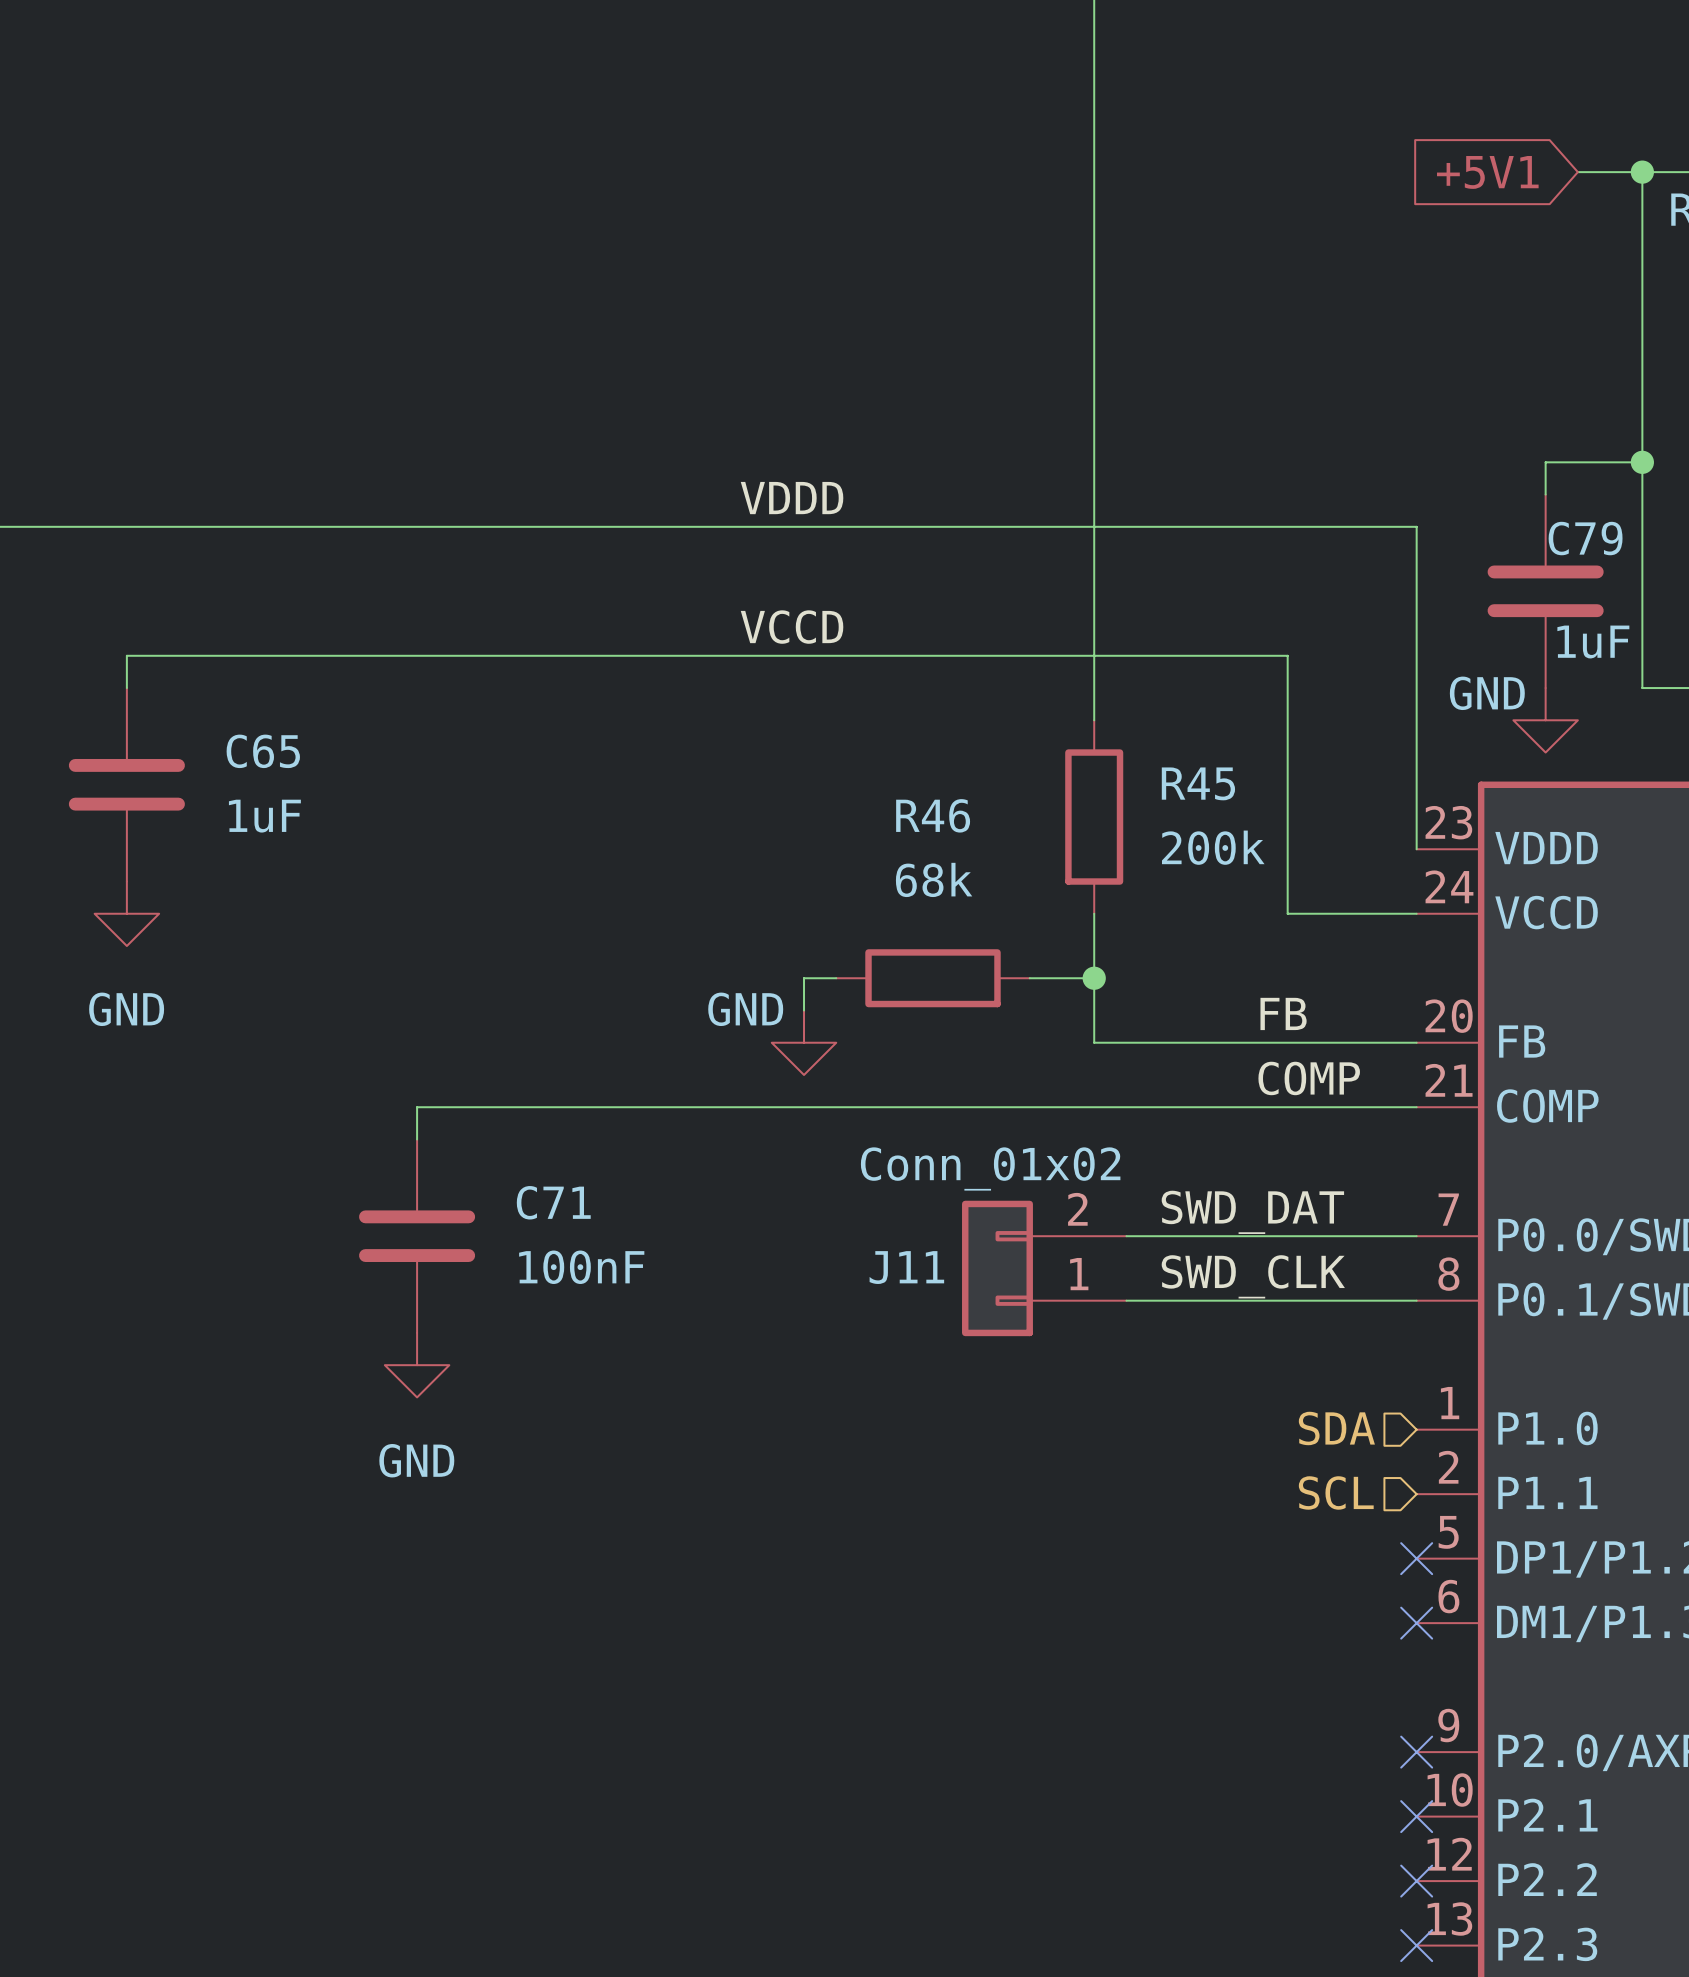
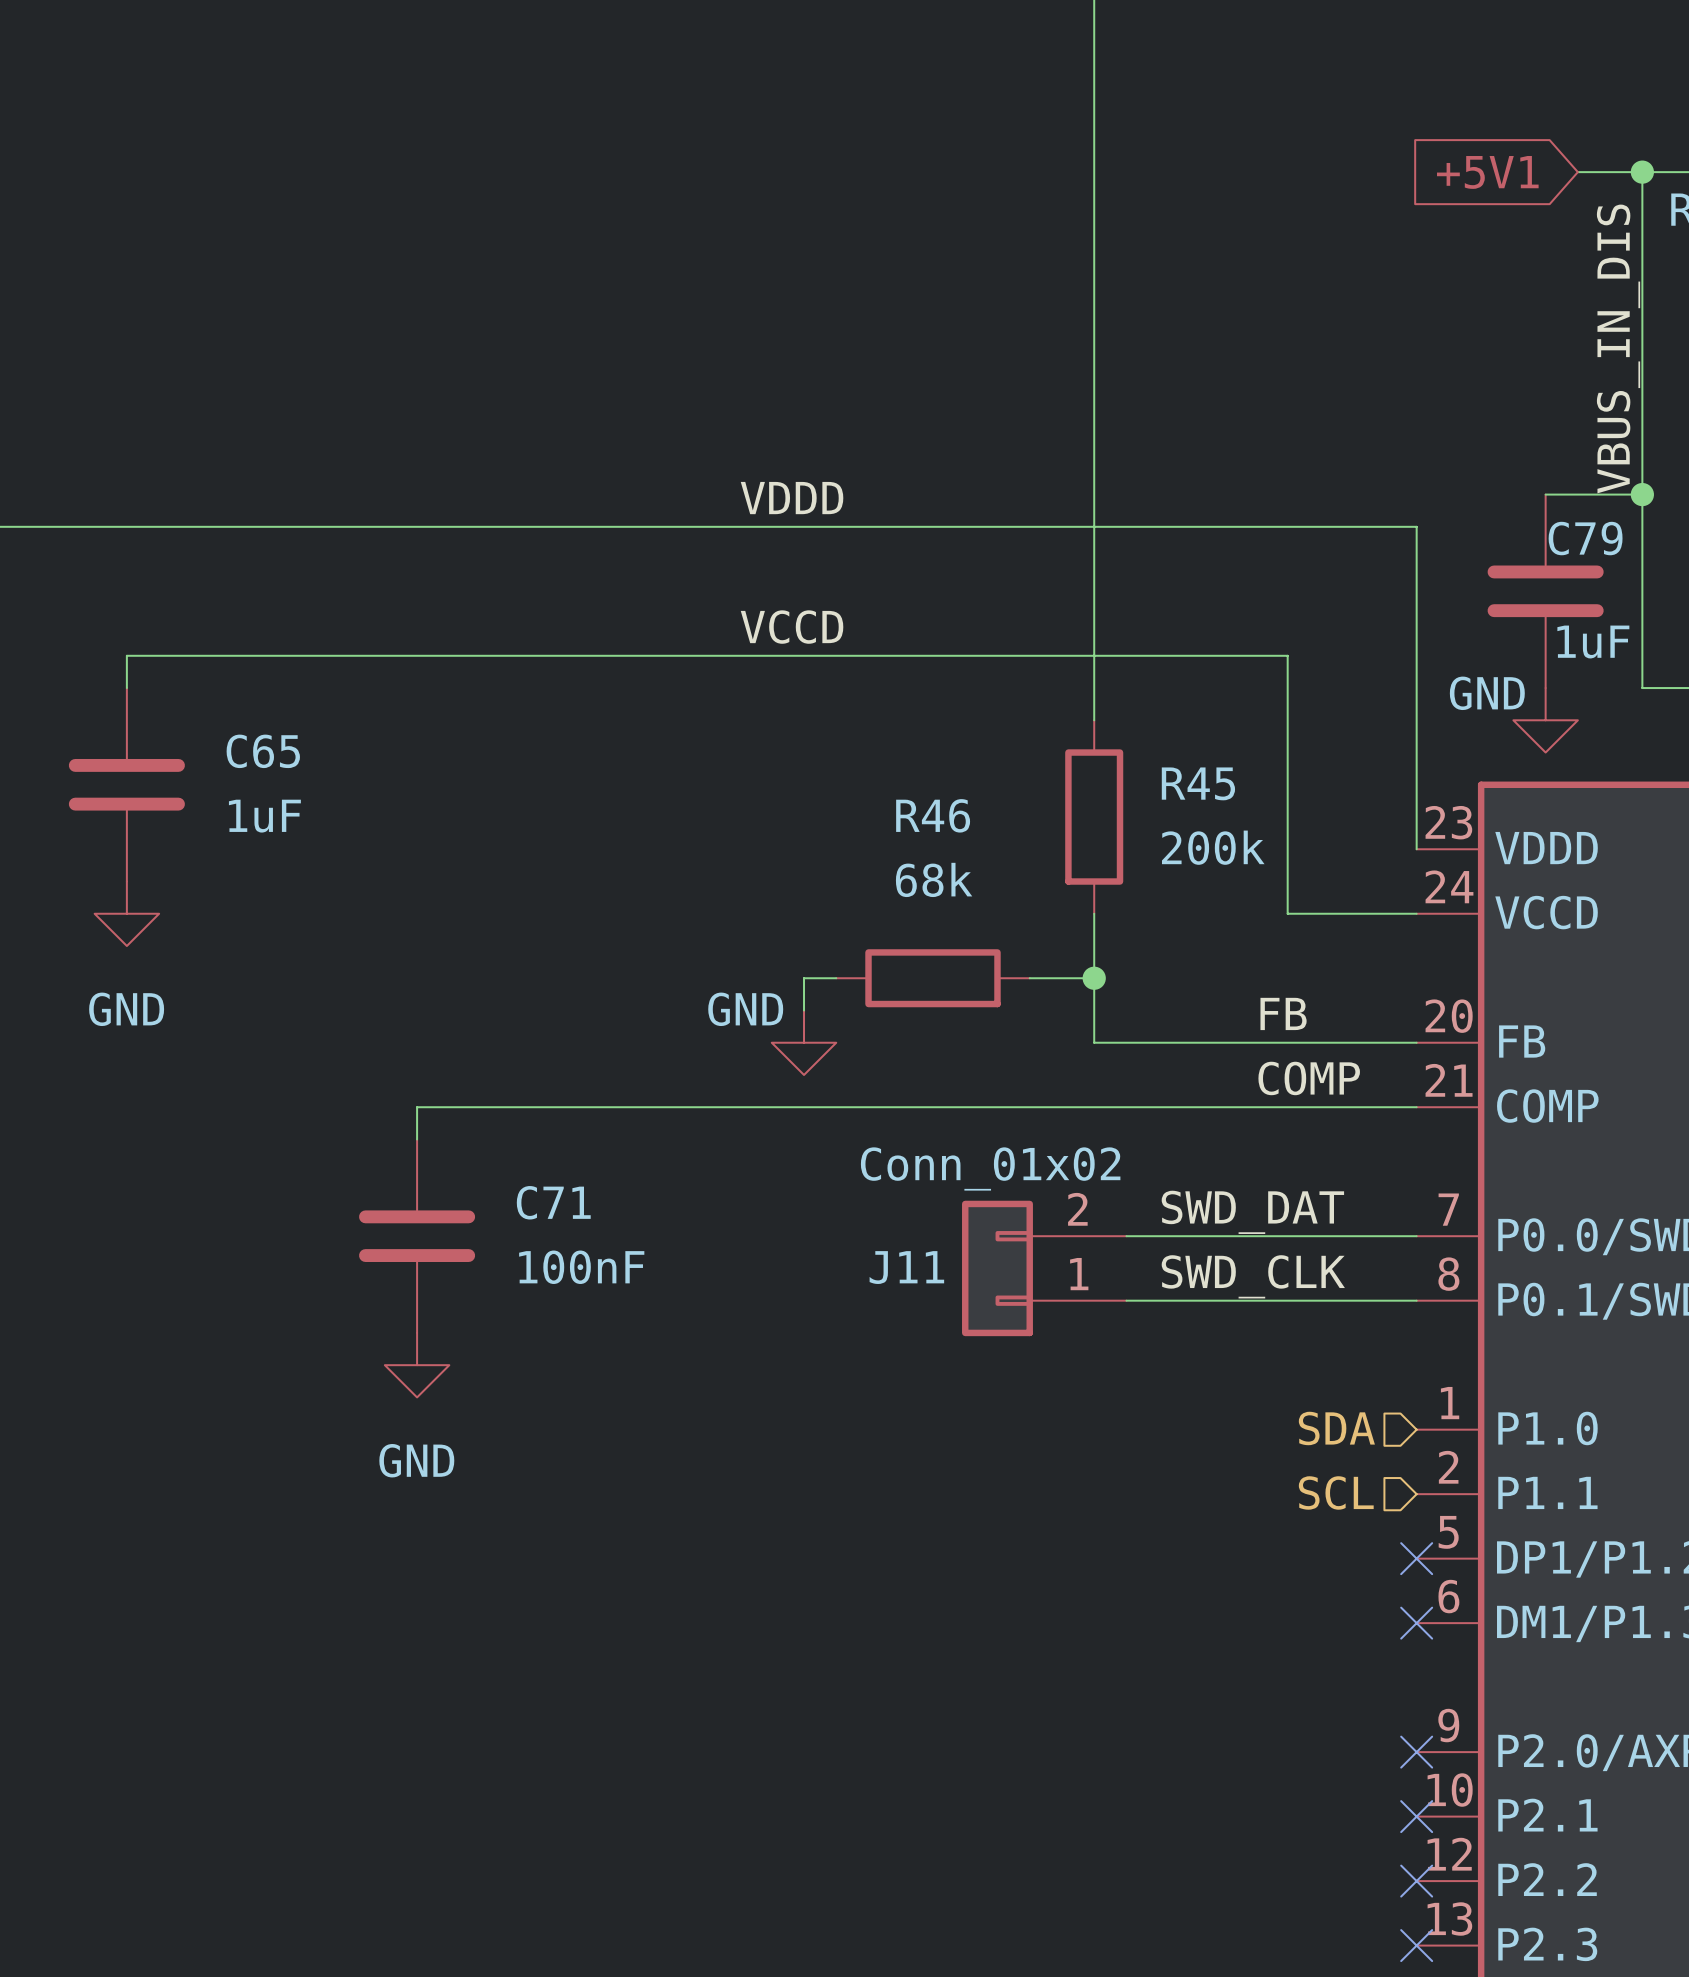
label: none -> VBUS_IN_DIS (1618, 348)
wire: (1642, 462) (1545, 462) (1545, 494) -> (1642, 494) (1545, 494)
junction position: (1642, 462) -> (1642, 494)

